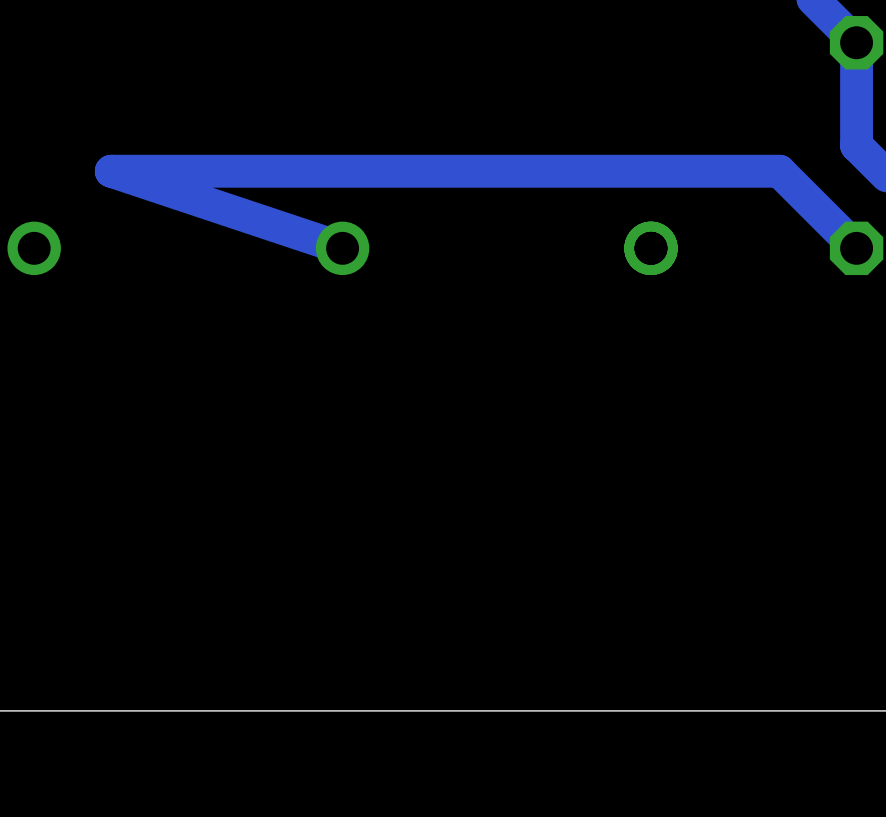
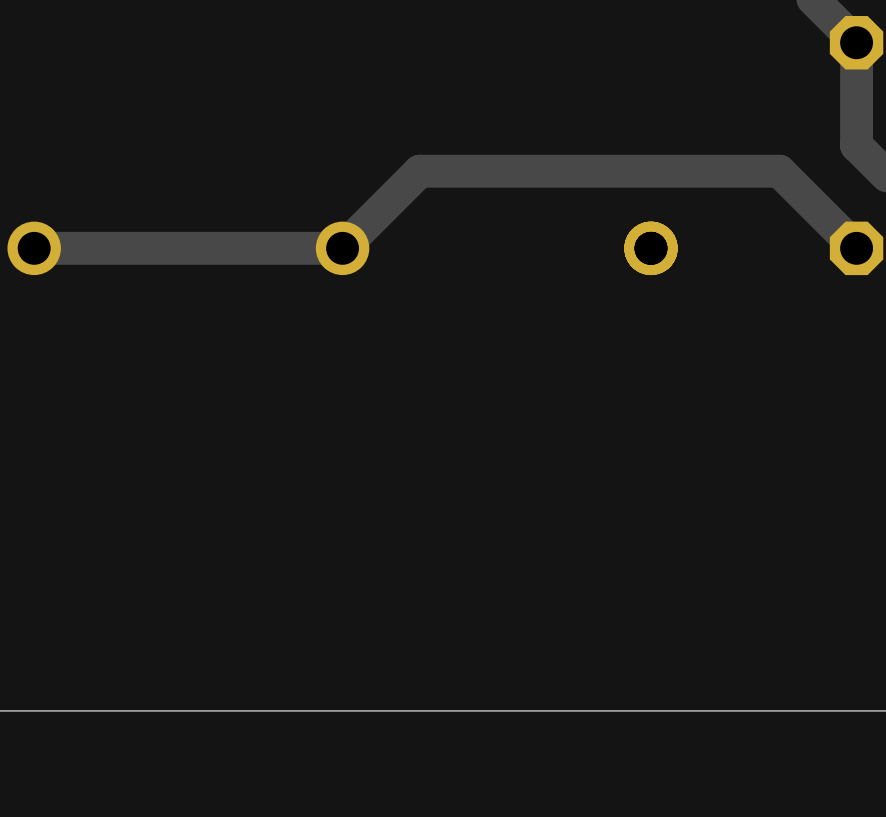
track: (419, 171) (111, 171) (342, 248) -> (419, 171) (342, 248) (34, 248)

